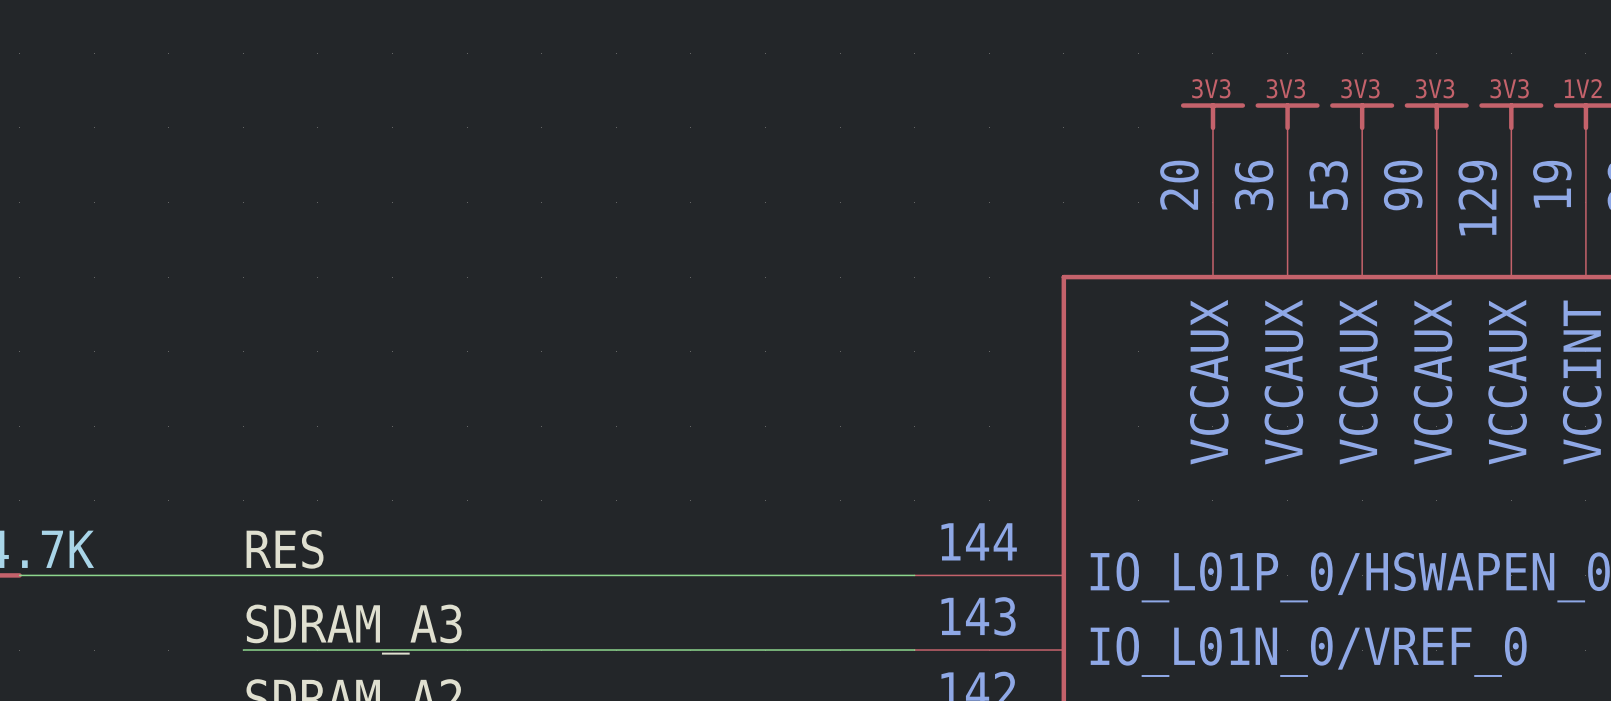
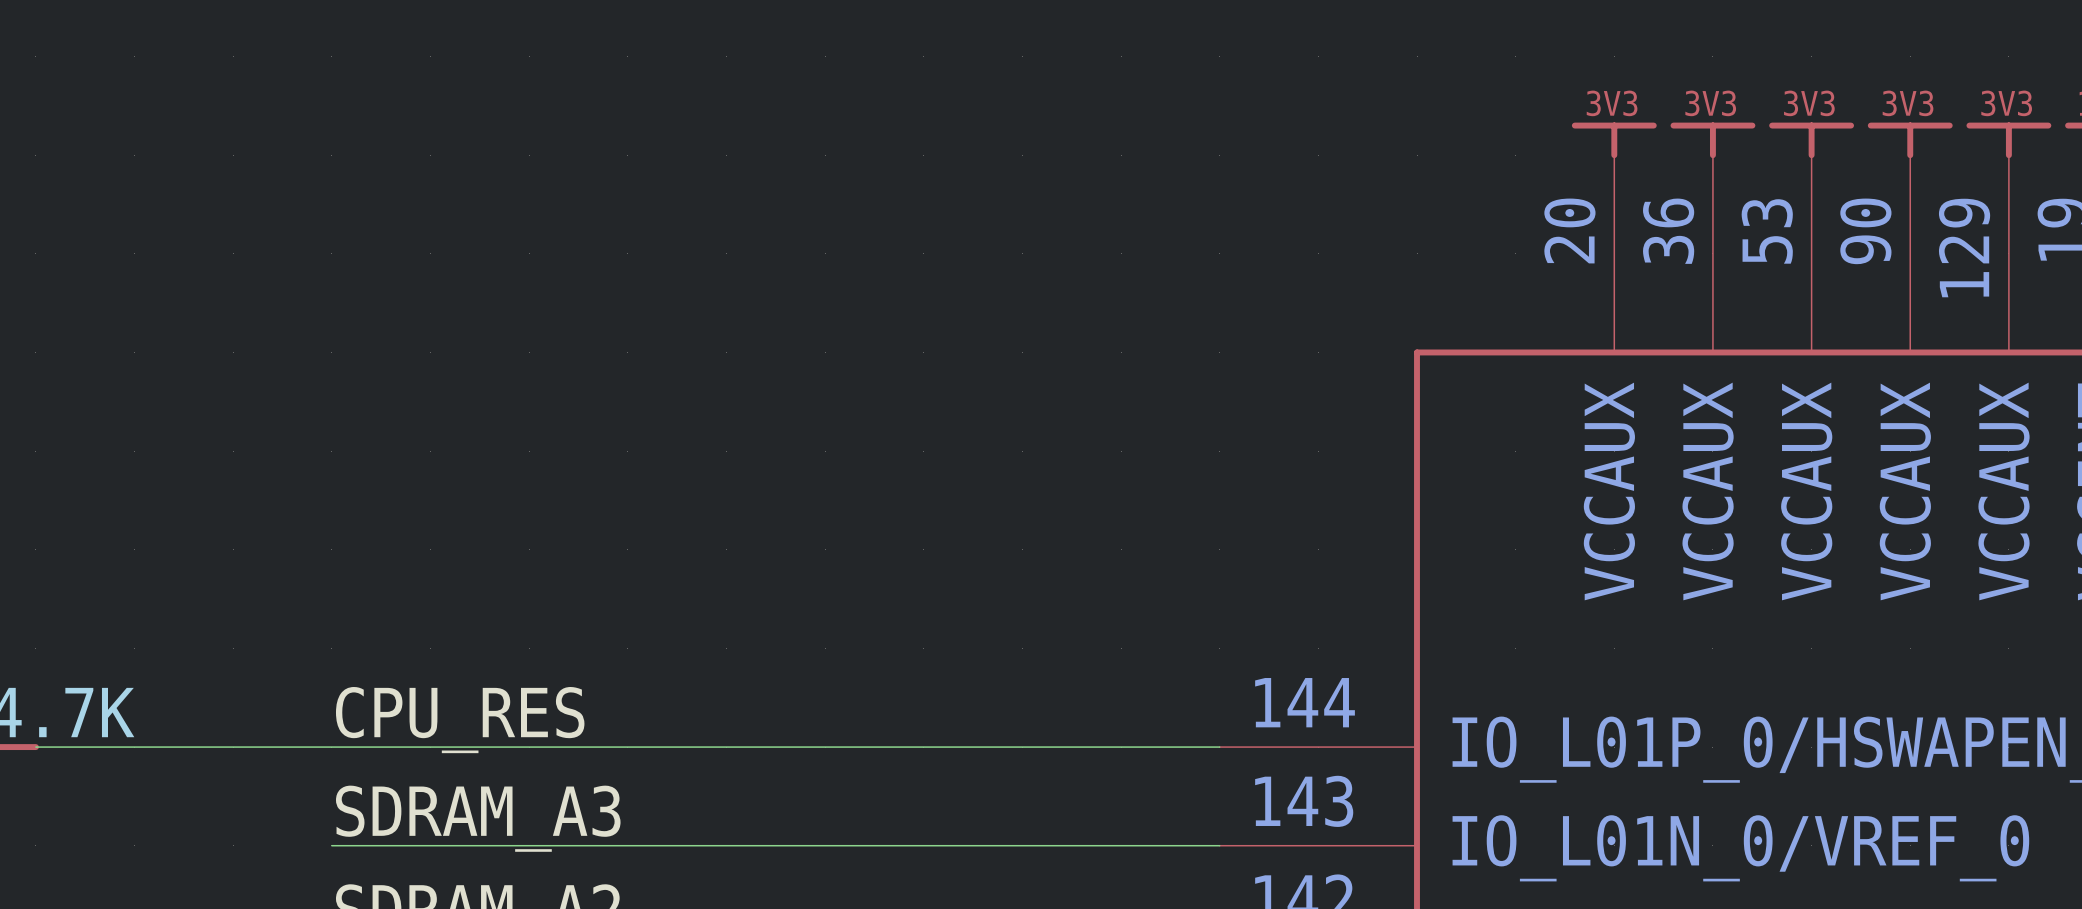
label: RES (285, 549) -> CPU_RES (460, 720)

